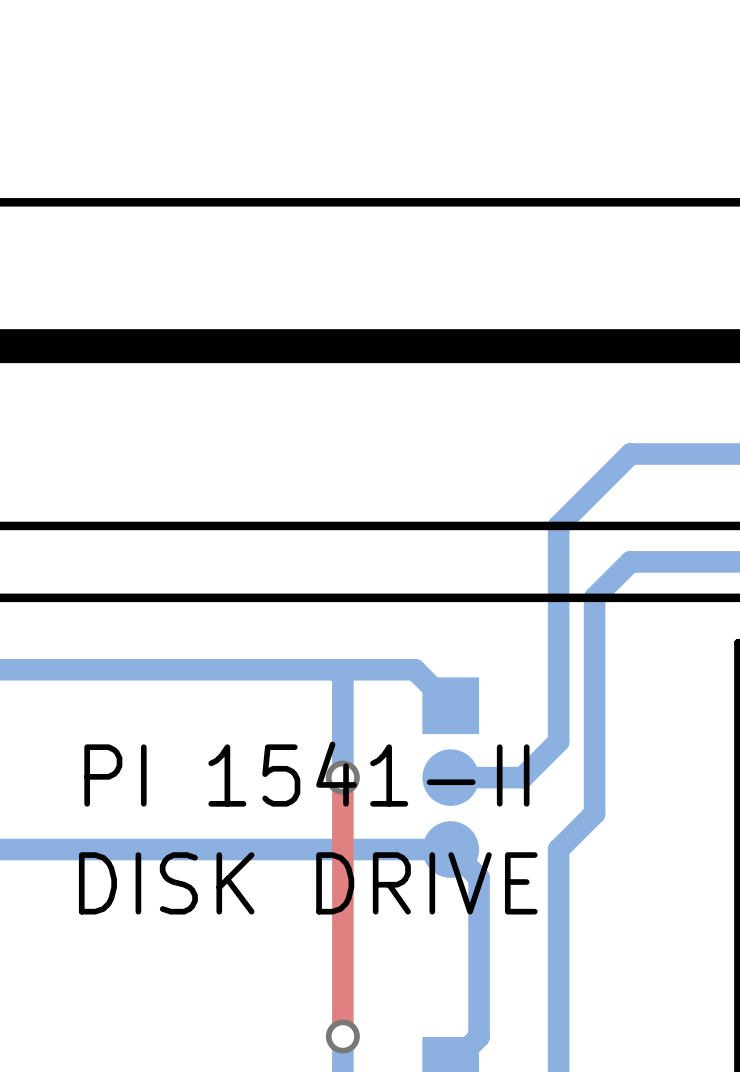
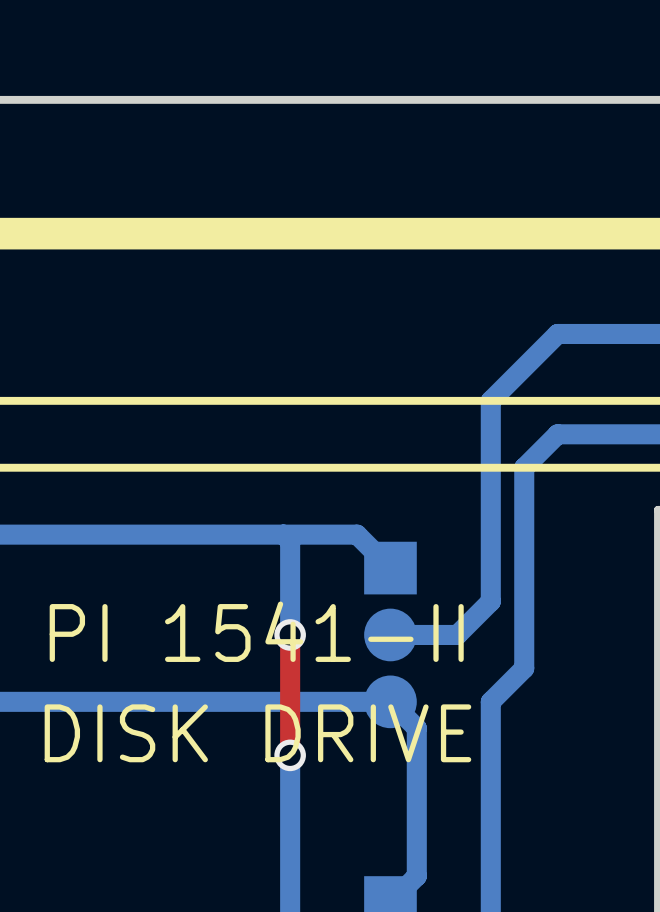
bottom track: none -> (290, 755) (290, 875)
top track: (342, 907) (342, 1036) -> none
via position: (342, 1036) -> (290, 755)

